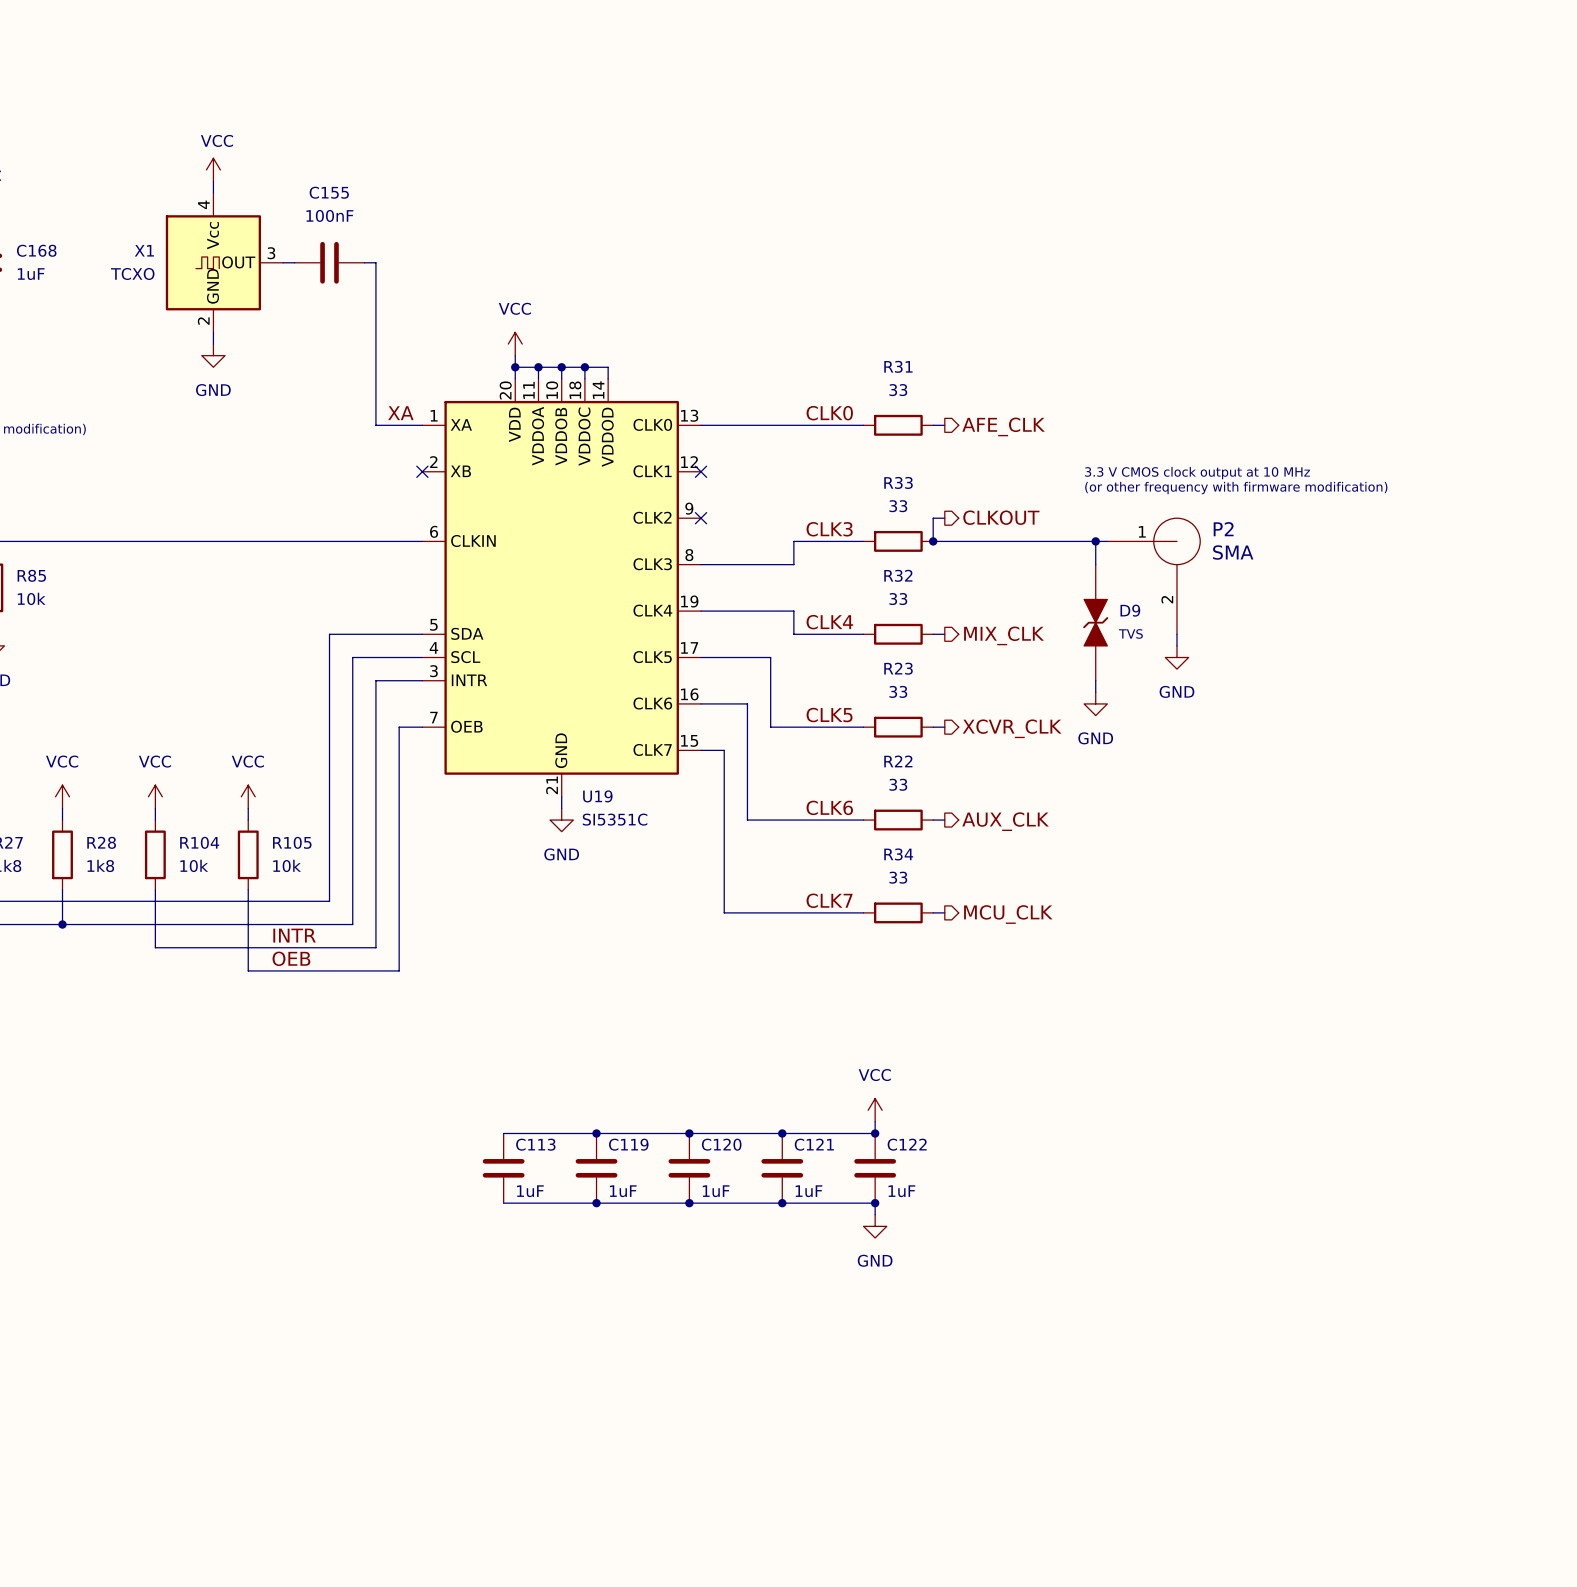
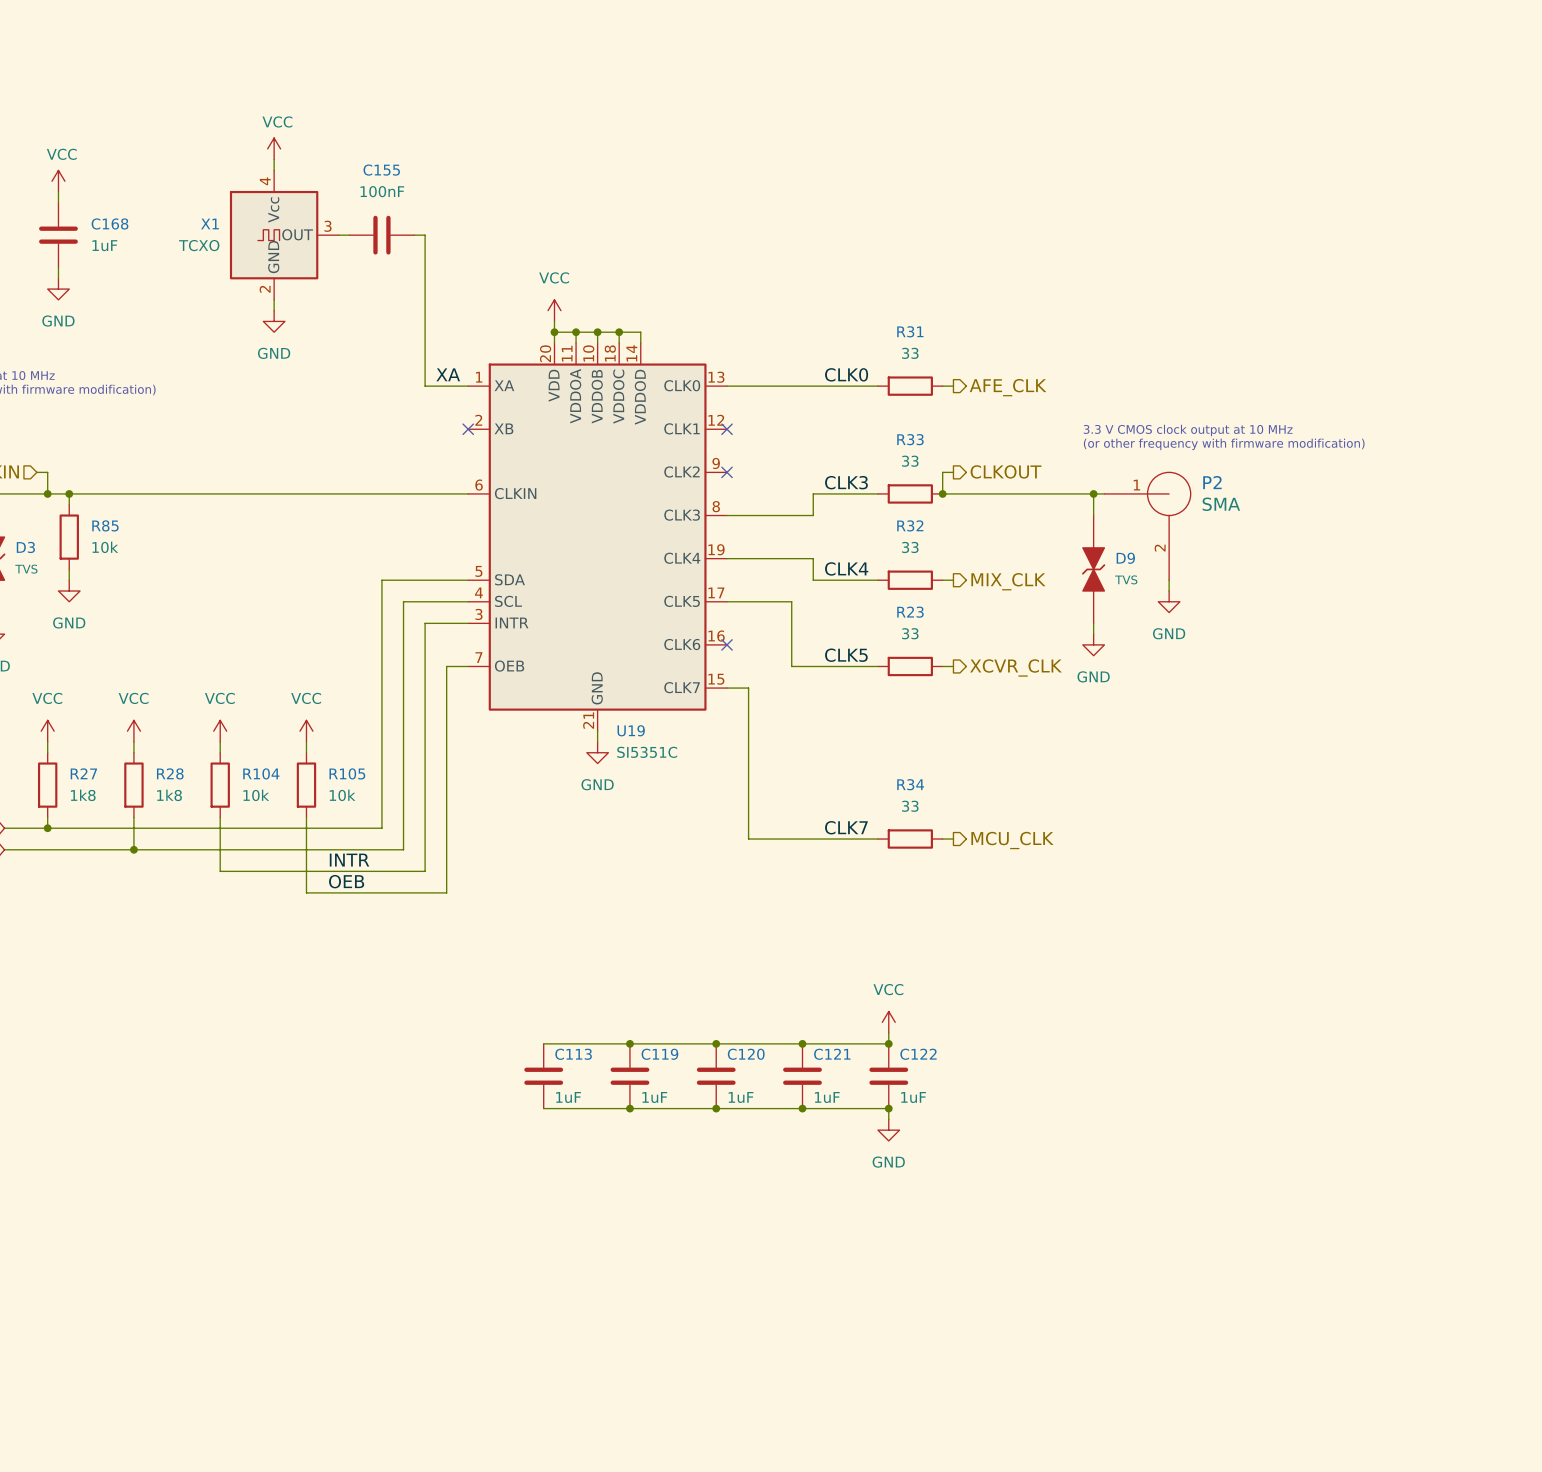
wire: (701, 703) (747, 703) (747, 820) (863, 820) -> none
no-connect mark: none -> (727, 644)
label: CLK6 (829, 807) -> none
R22: 33 (898, 820) -> none
wire: (933, 820) (944, 820) -> none
hierarchical label: AUX_CLK (1005, 821) -> none

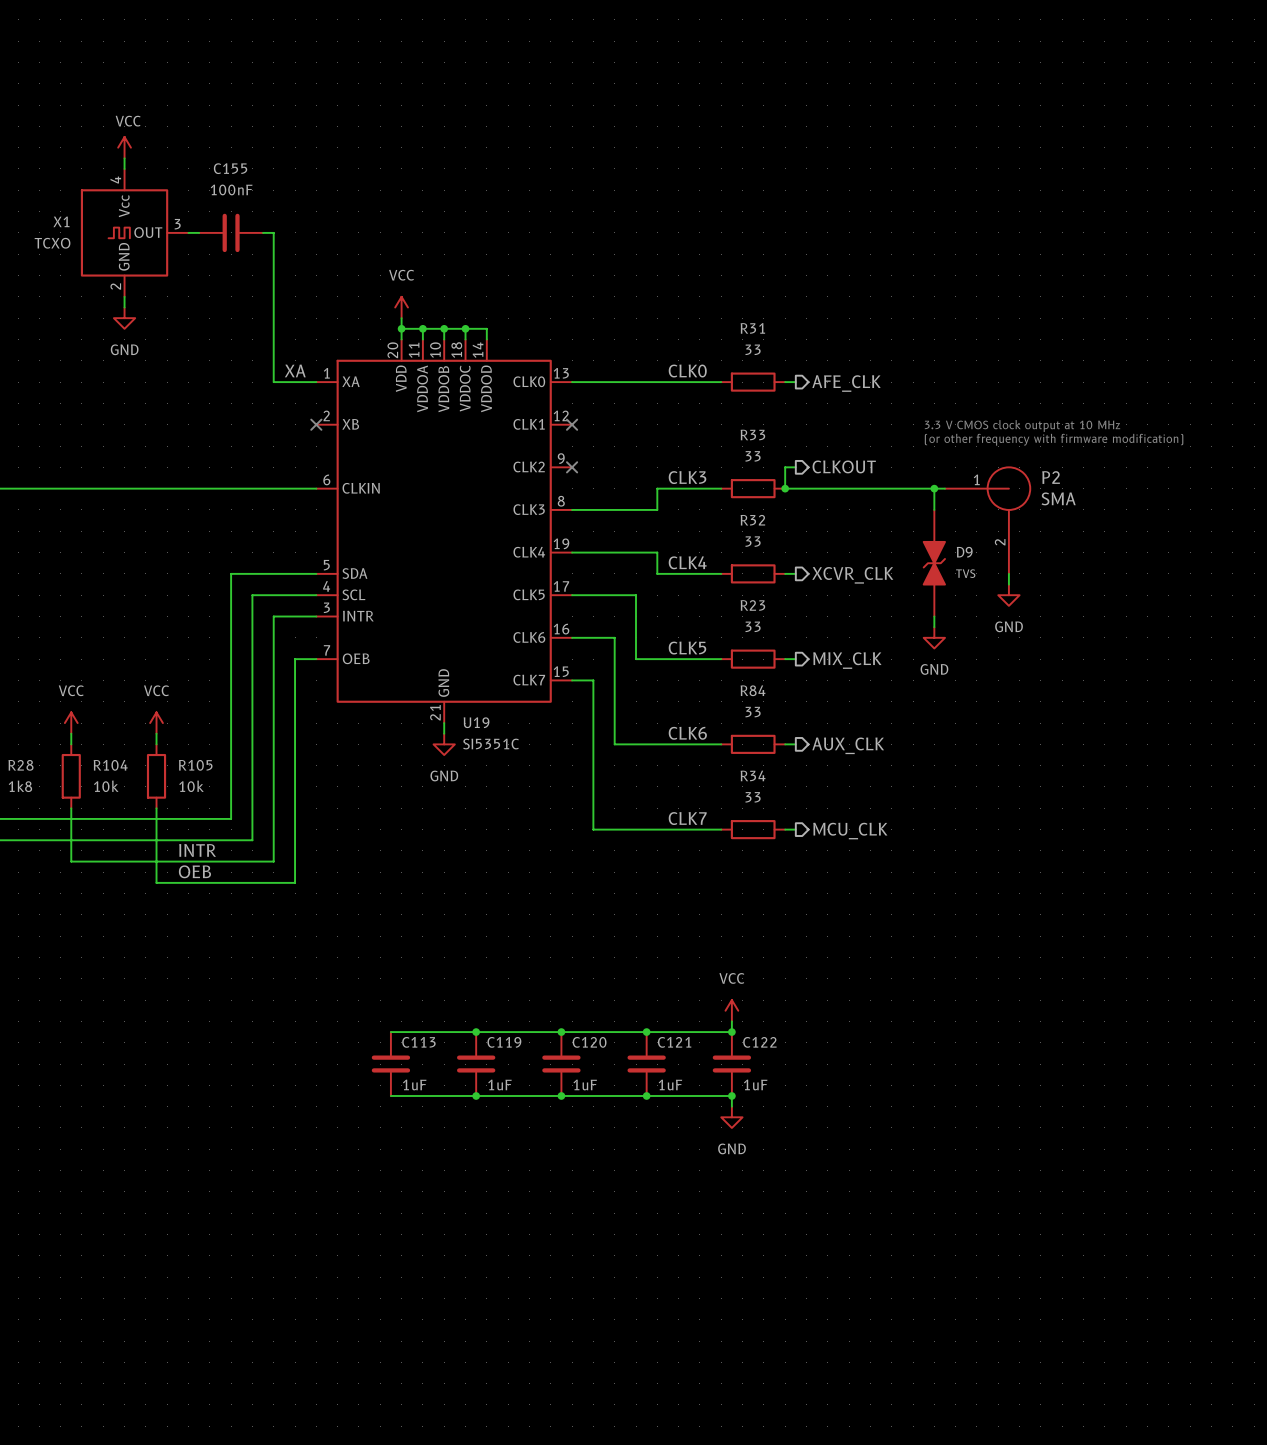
hierarchical label: MIX_CLK (1008, 581) -> XCVR_CLK (852, 575)
wire: none -> (572, 637) (614, 637) (614, 744) (721, 744)
no-connect mark: (727, 644) -> none
hierarchical label: XCVR_CLK (1015, 667) -> MIX_CLK (847, 660)
label: none -> CLK6 (687, 733)
R84: none -> 33 (753, 744)
wire: none -> (785, 744) (795, 744)
hierarchical label: none -> AUX_CLK (848, 745)

